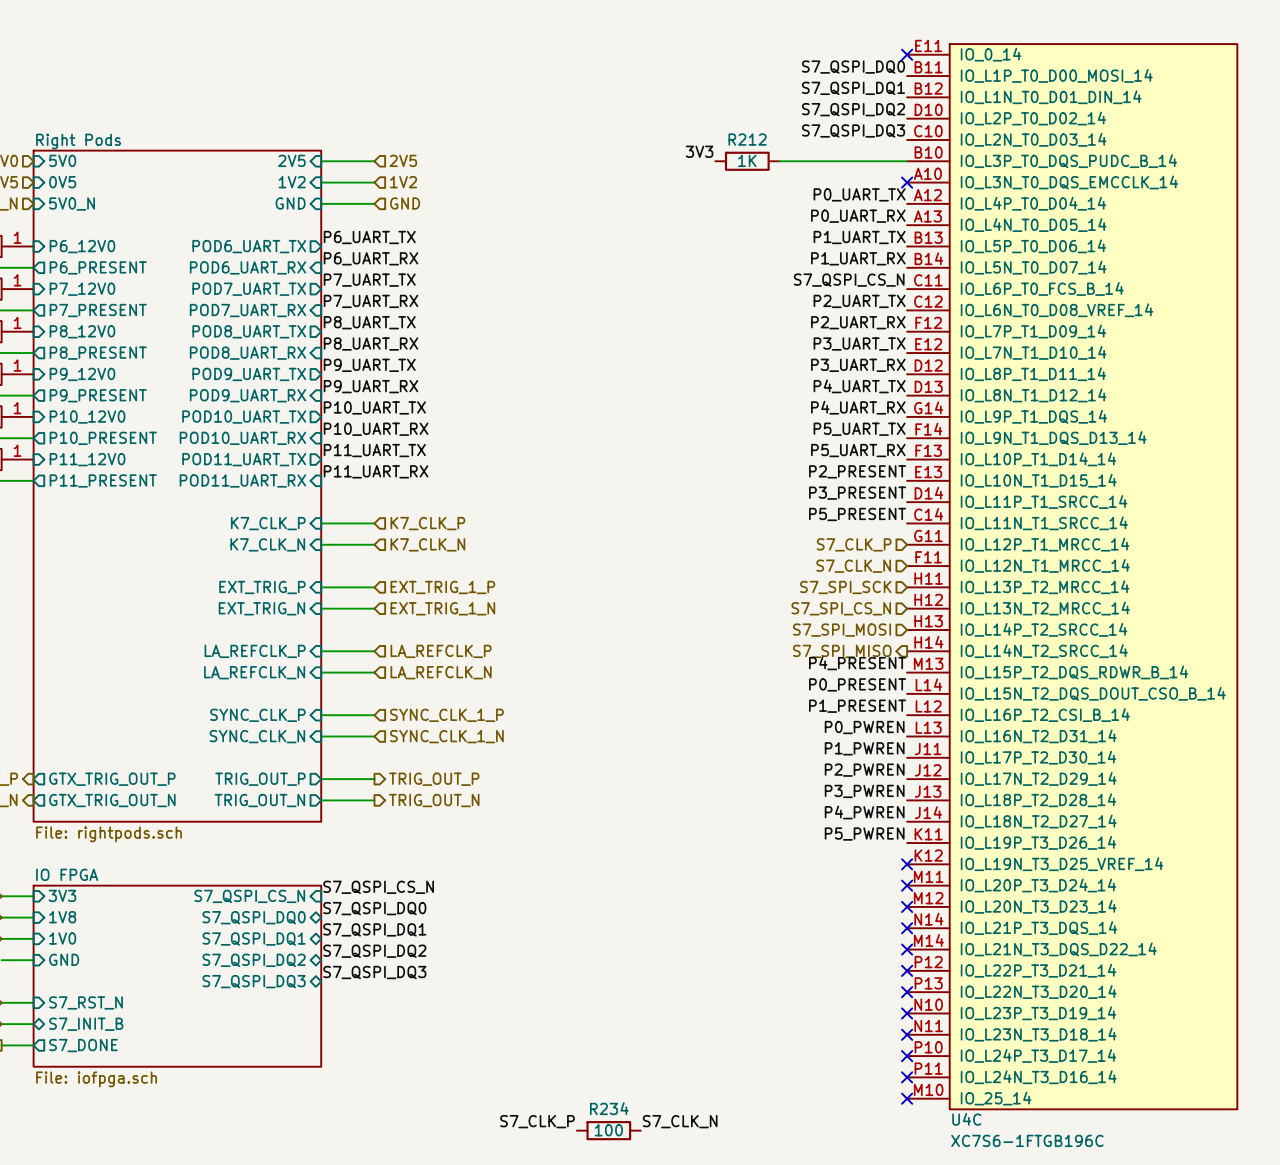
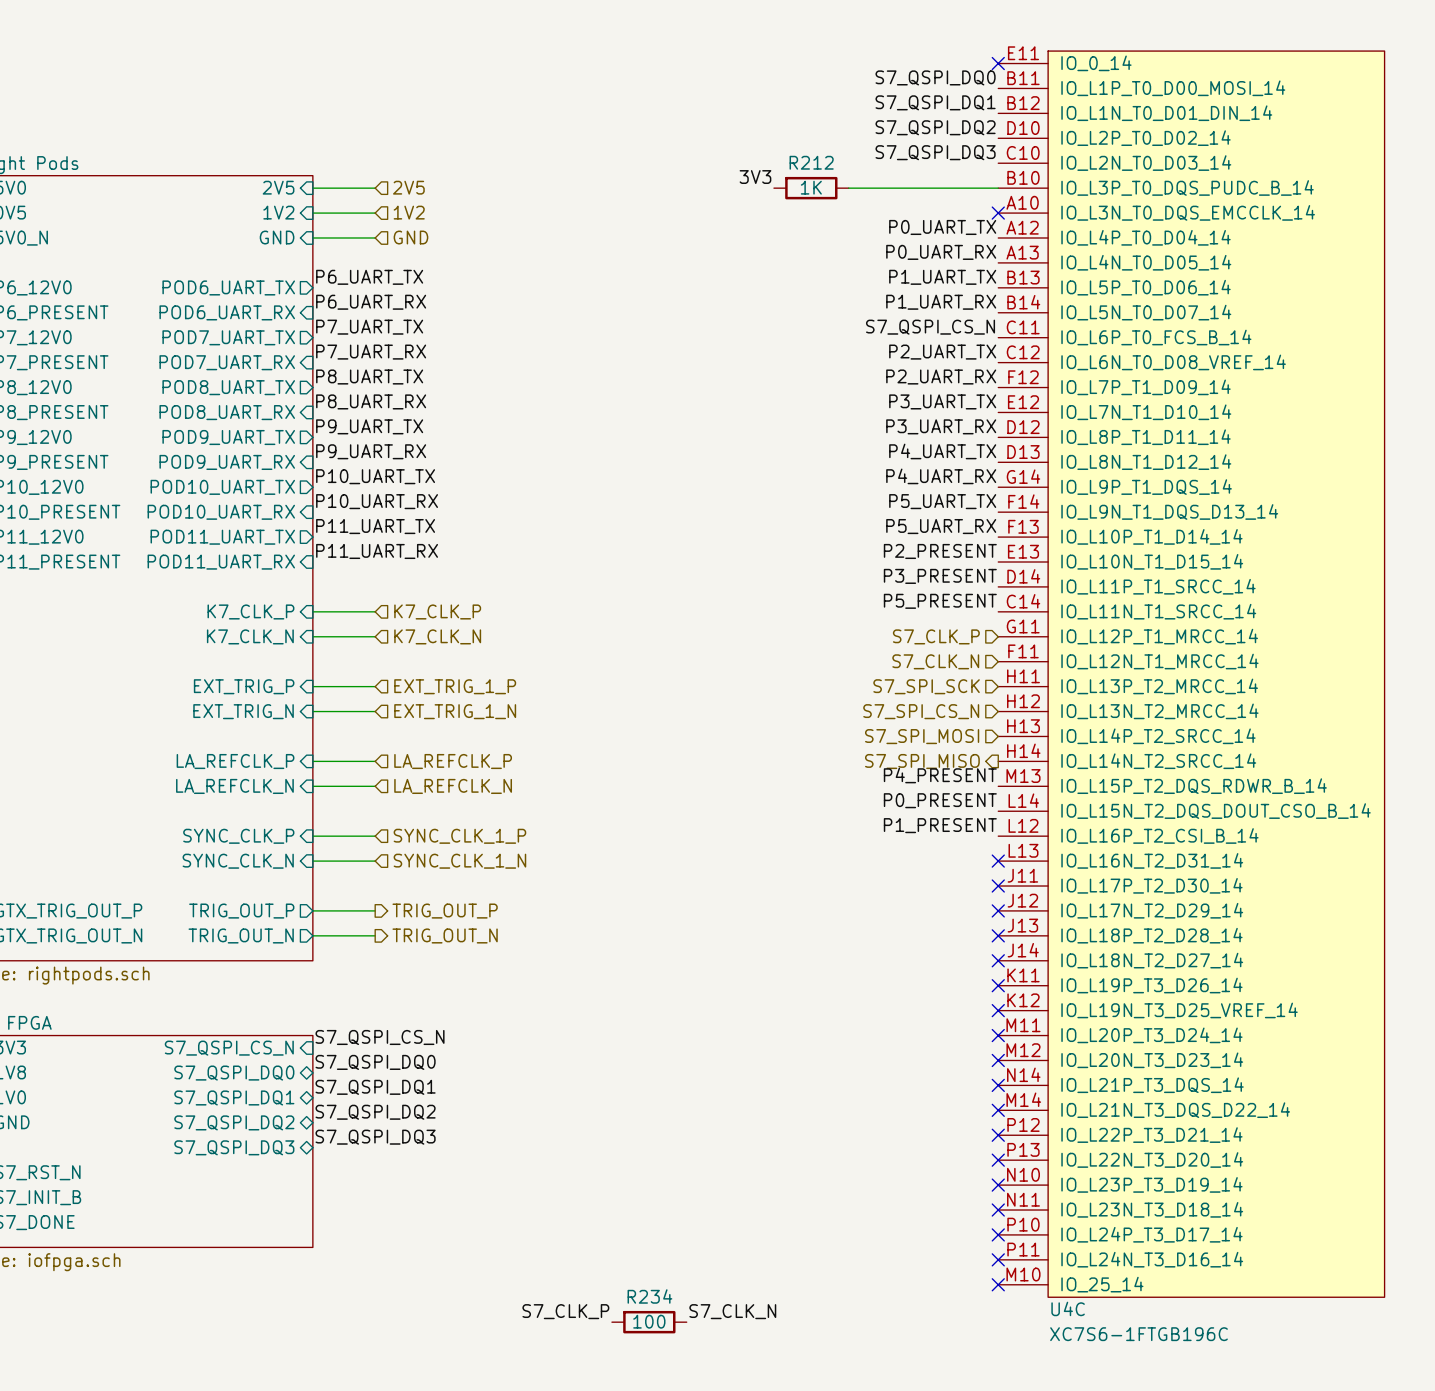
label: P0_PWREN (864, 727) -> none
no-connect mark: none -> (998, 861)
label: P1_PWREN (864, 748) -> none
no-connect mark: none -> (998, 886)
label: P2_PWREN (864, 770) -> none
no-connect mark: none -> (998, 910)
label: P3_PWREN (864, 791) -> none
no-connect mark: none -> (998, 935)
label: P4_PWREN (864, 812) -> none
no-connect mark: none -> (998, 960)
label: P5_PWREN (864, 834) -> none
no-connect mark: none -> (998, 985)

